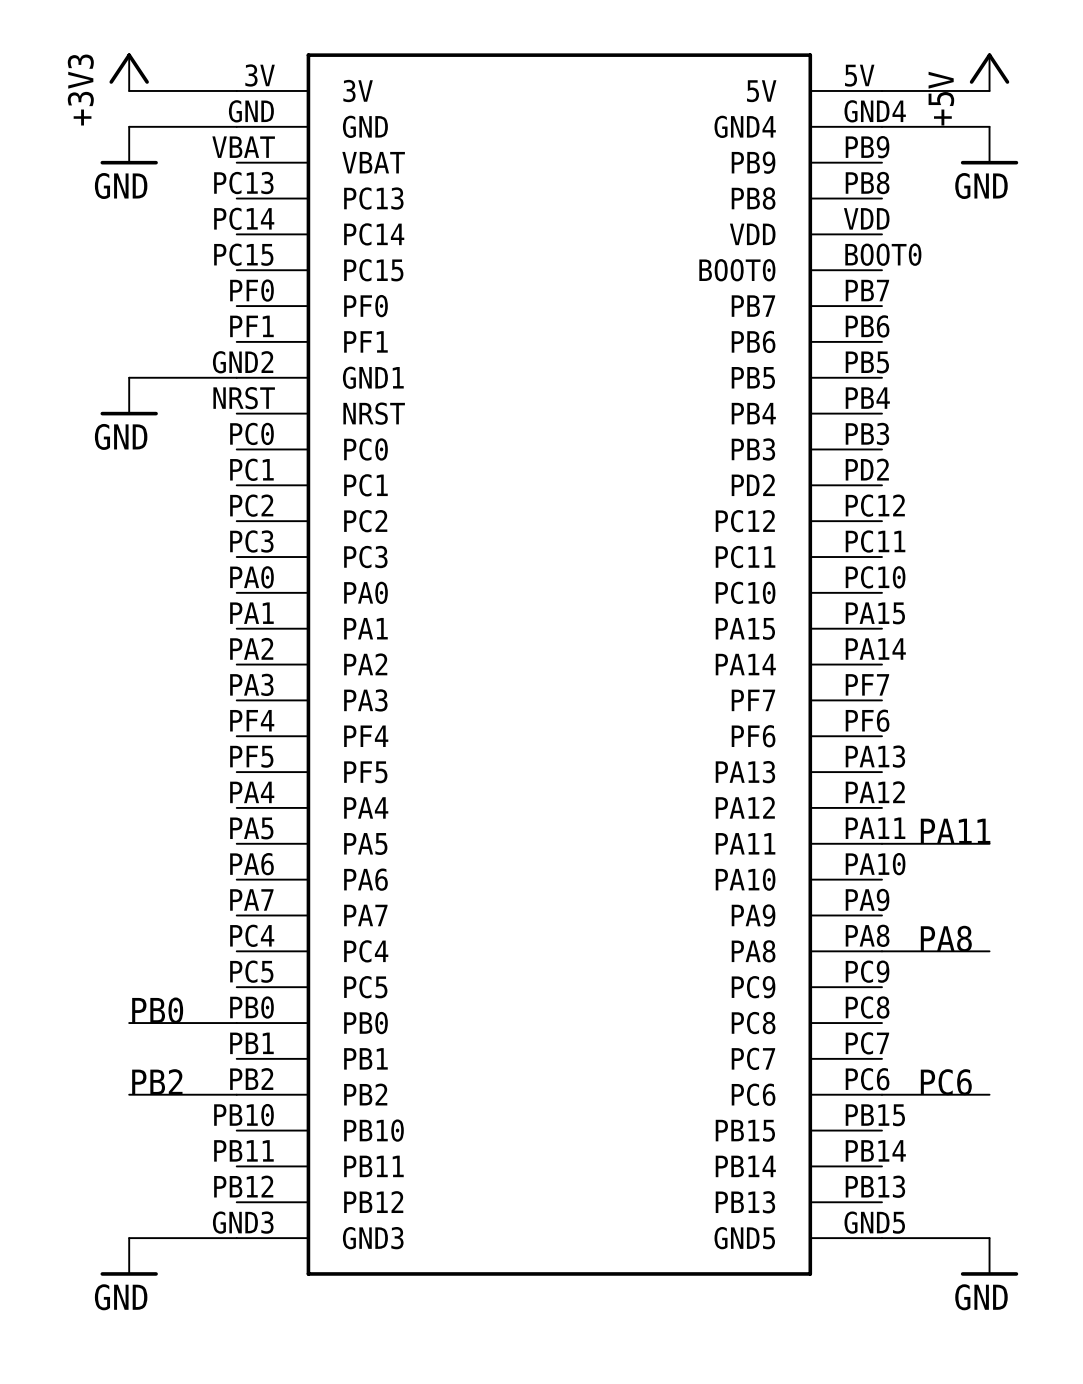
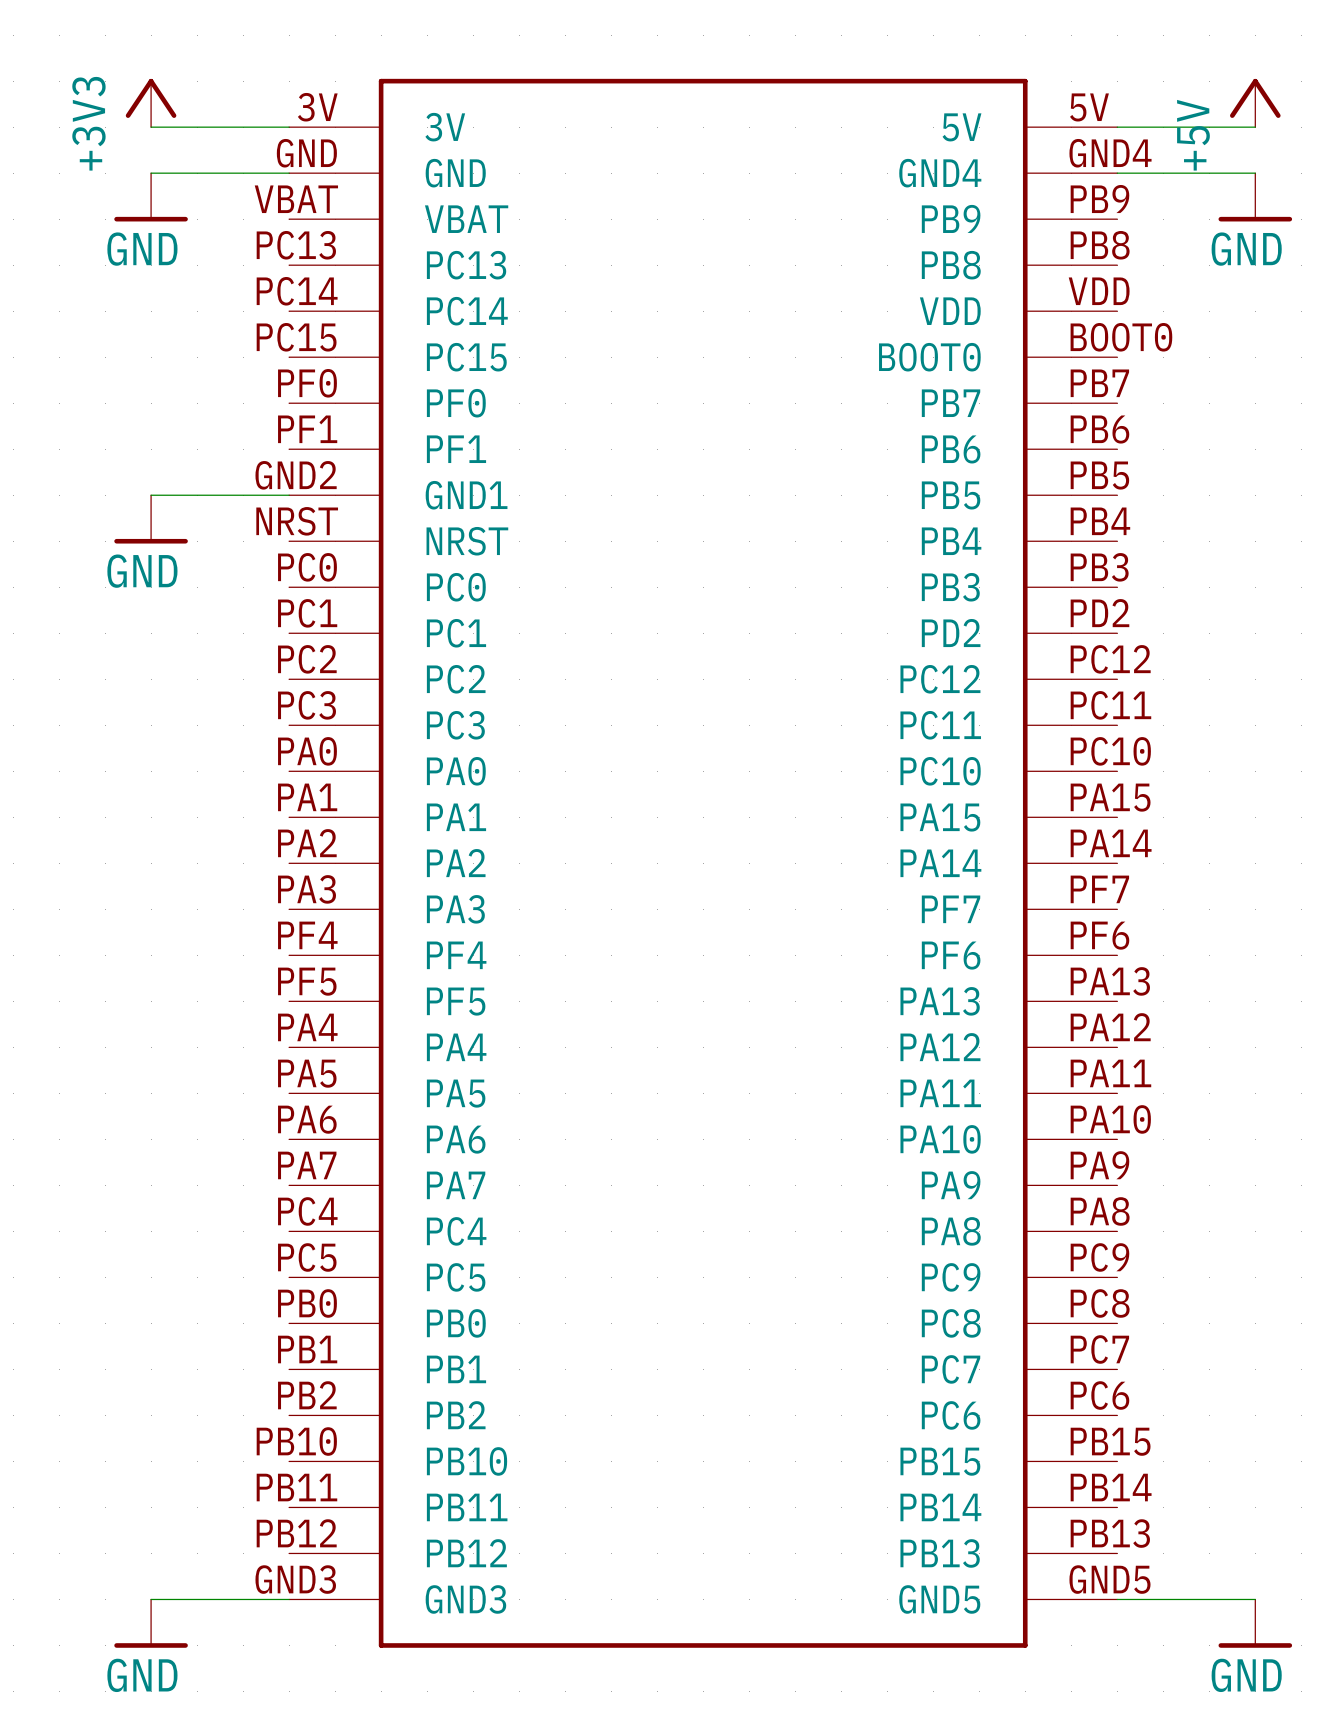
label: PA11 (955, 831) -> none
wire: (881, 843) (989, 843) -> none
label: PA8 (946, 938) -> none
wire: (881, 951) (989, 951) -> none
label: PB0 (157, 1010) -> none
wire: (129, 1023) (236, 1023) -> none
label: PB2 (157, 1081) -> none
label: PC6 (946, 1082) -> none
wire: (129, 1094) (236, 1094) -> none
wire: (881, 1094) (989, 1094) -> none

